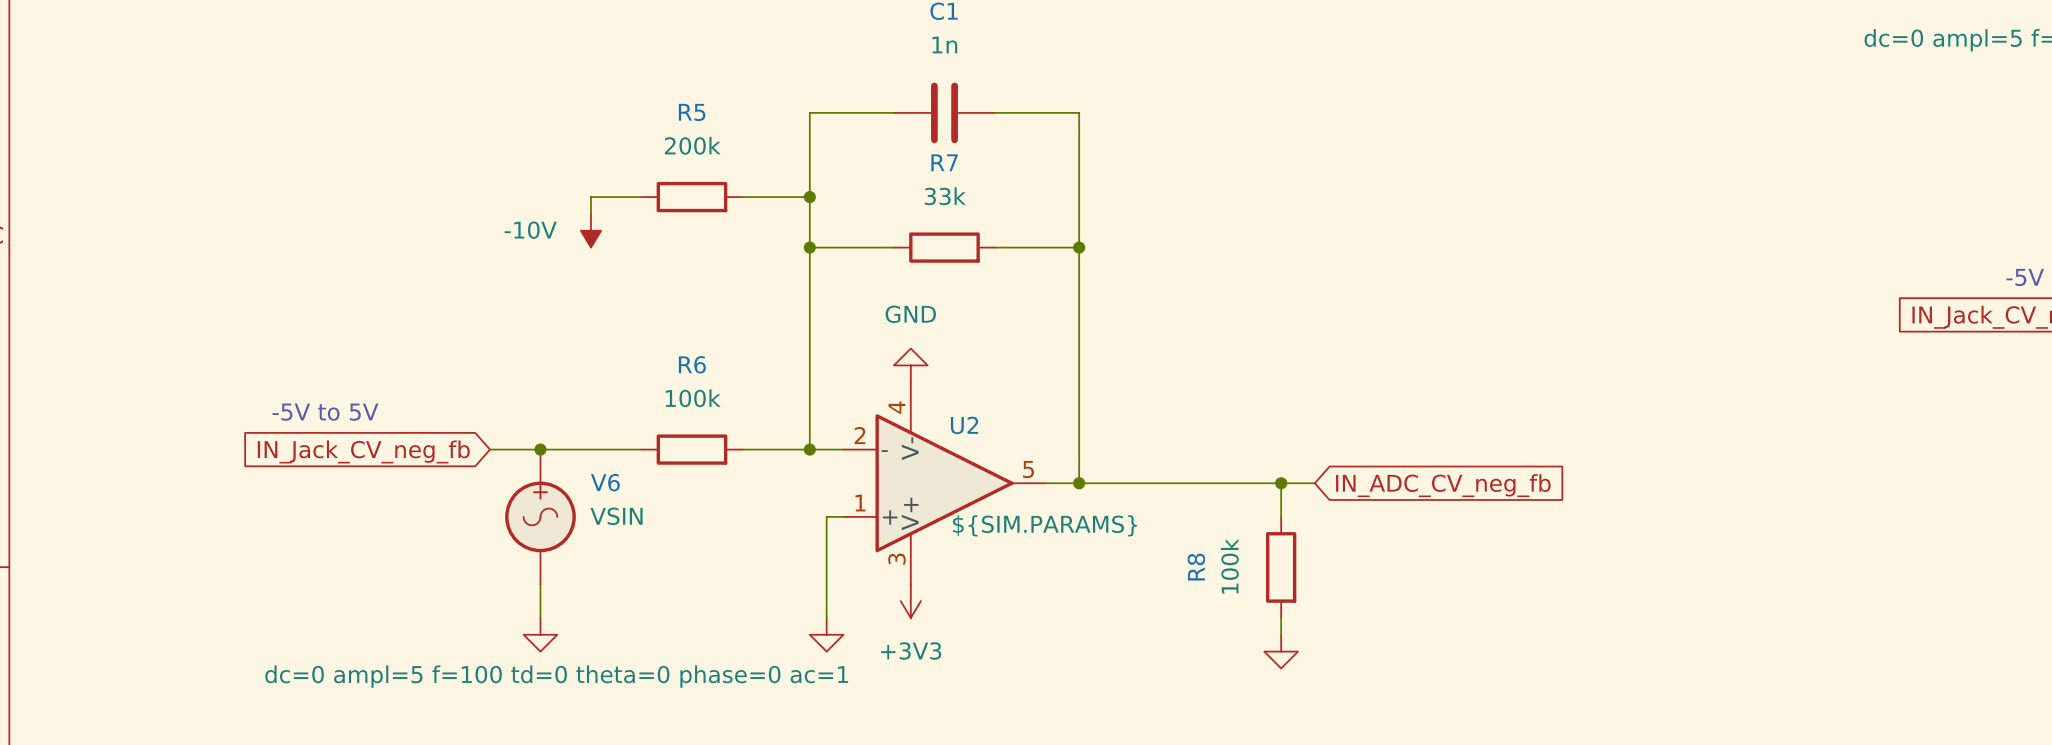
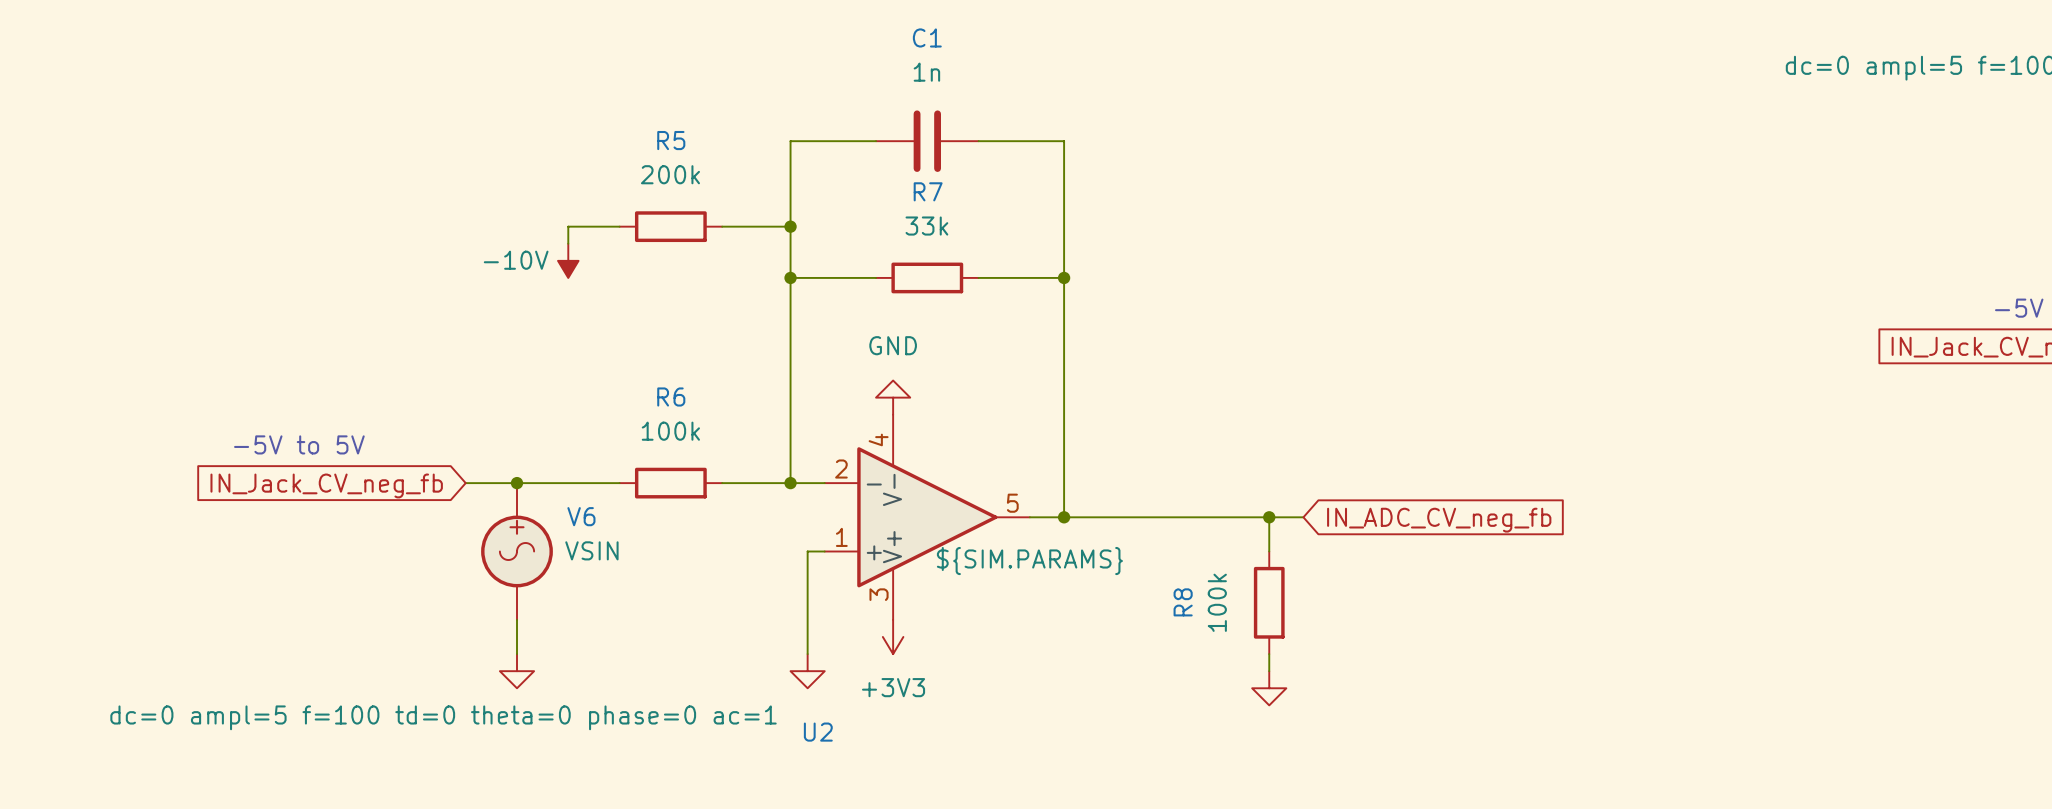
U2 name position: U2 (964, 425) -> U2 (818, 732)
V6 text position: dc=0 ampl=5 f=100 td=0 theta=0 phase=0 ac=1 (556, 676) -> dc=0 ampl=5 f=100 td=0 theta=0 phase=0 ac=1 (443, 717)

